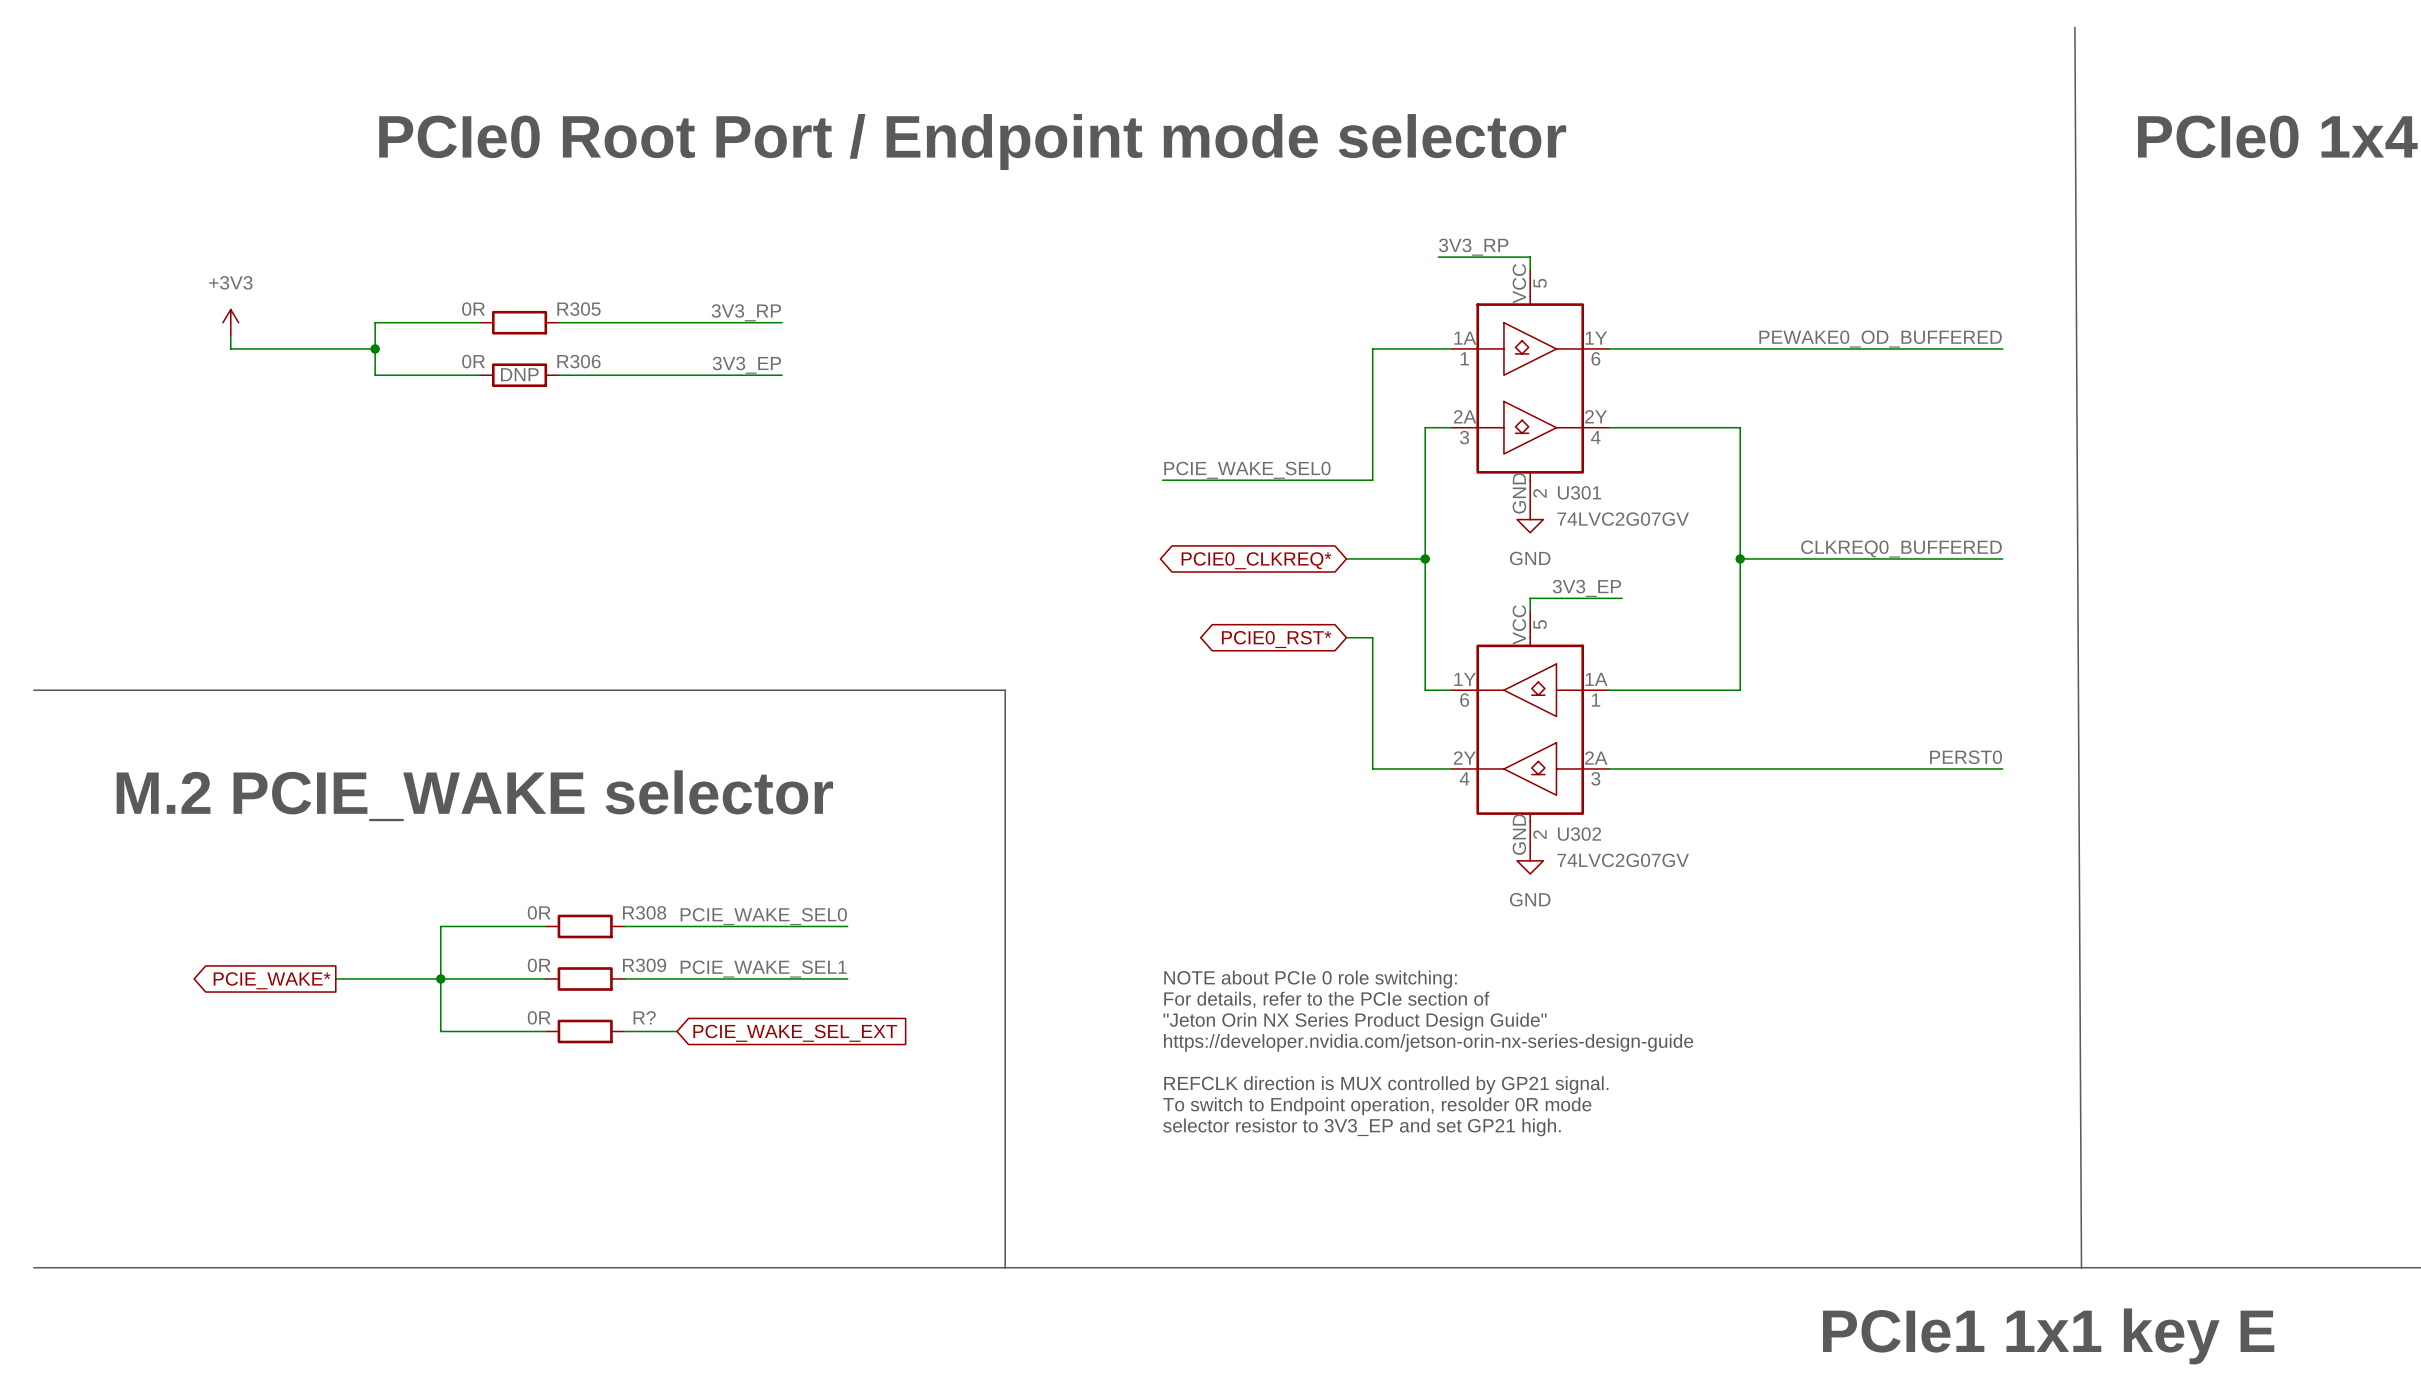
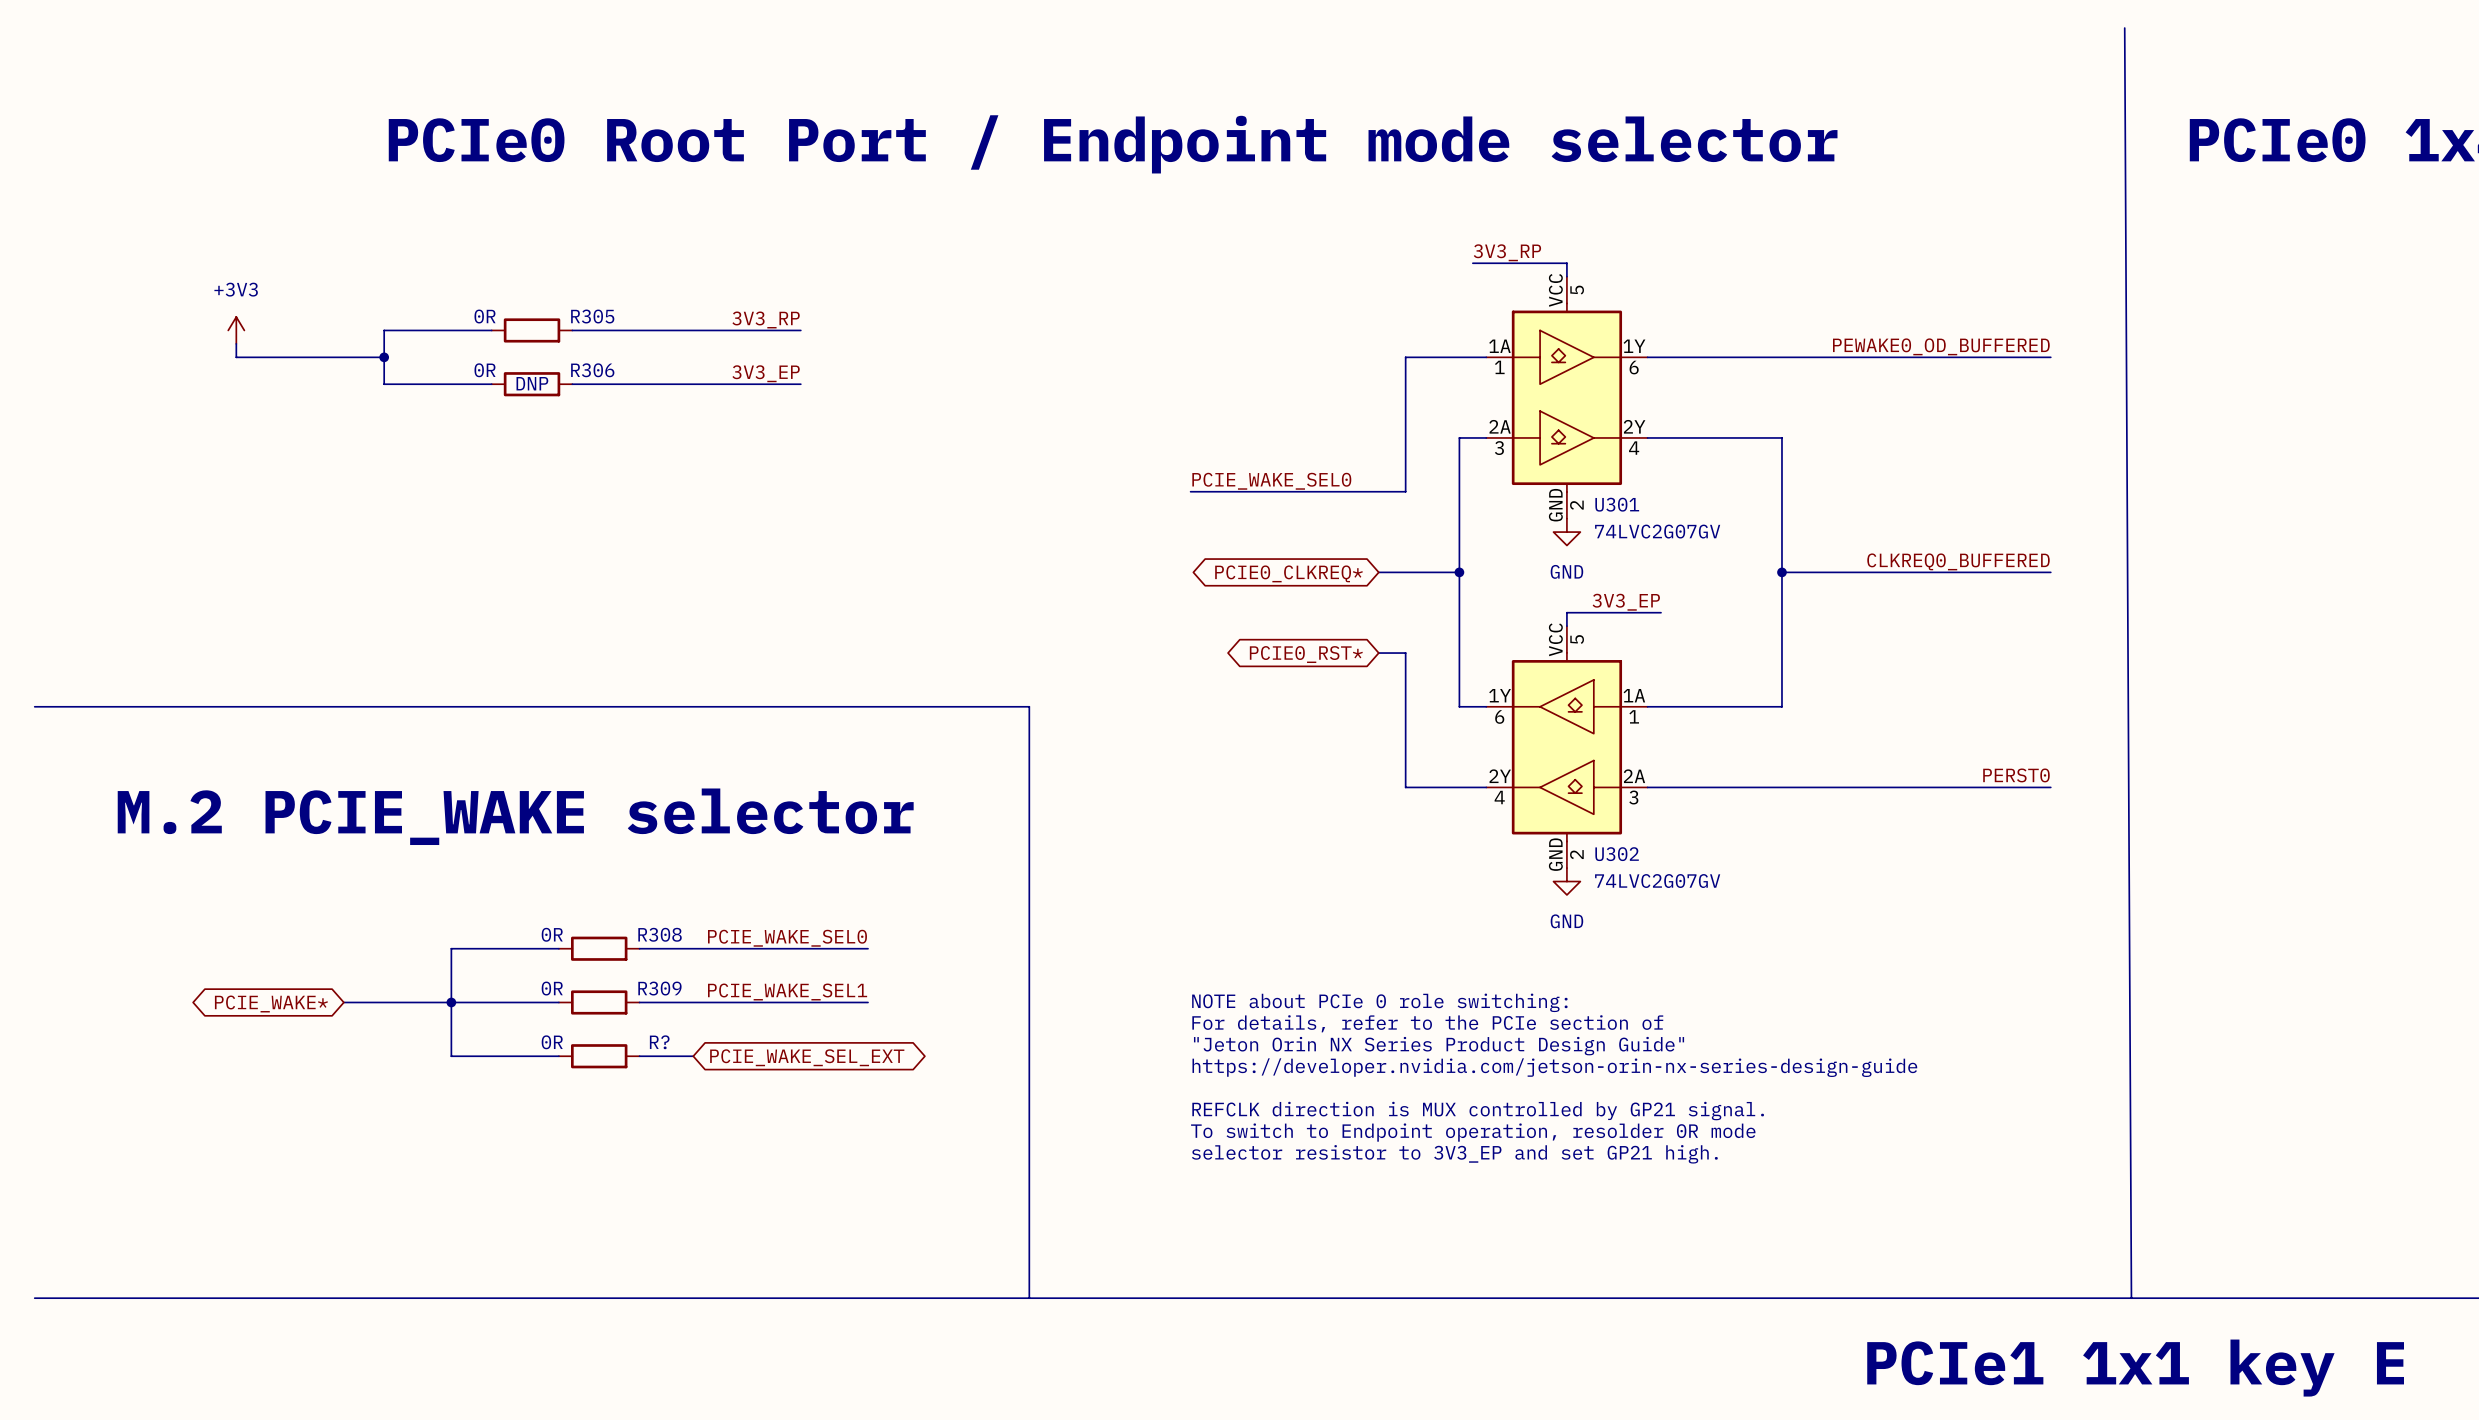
global label shape: output (272, 980) -> bidirectional (271, 1003)
global label shape: input (795, 1033) -> bidirectional (807, 1057)

